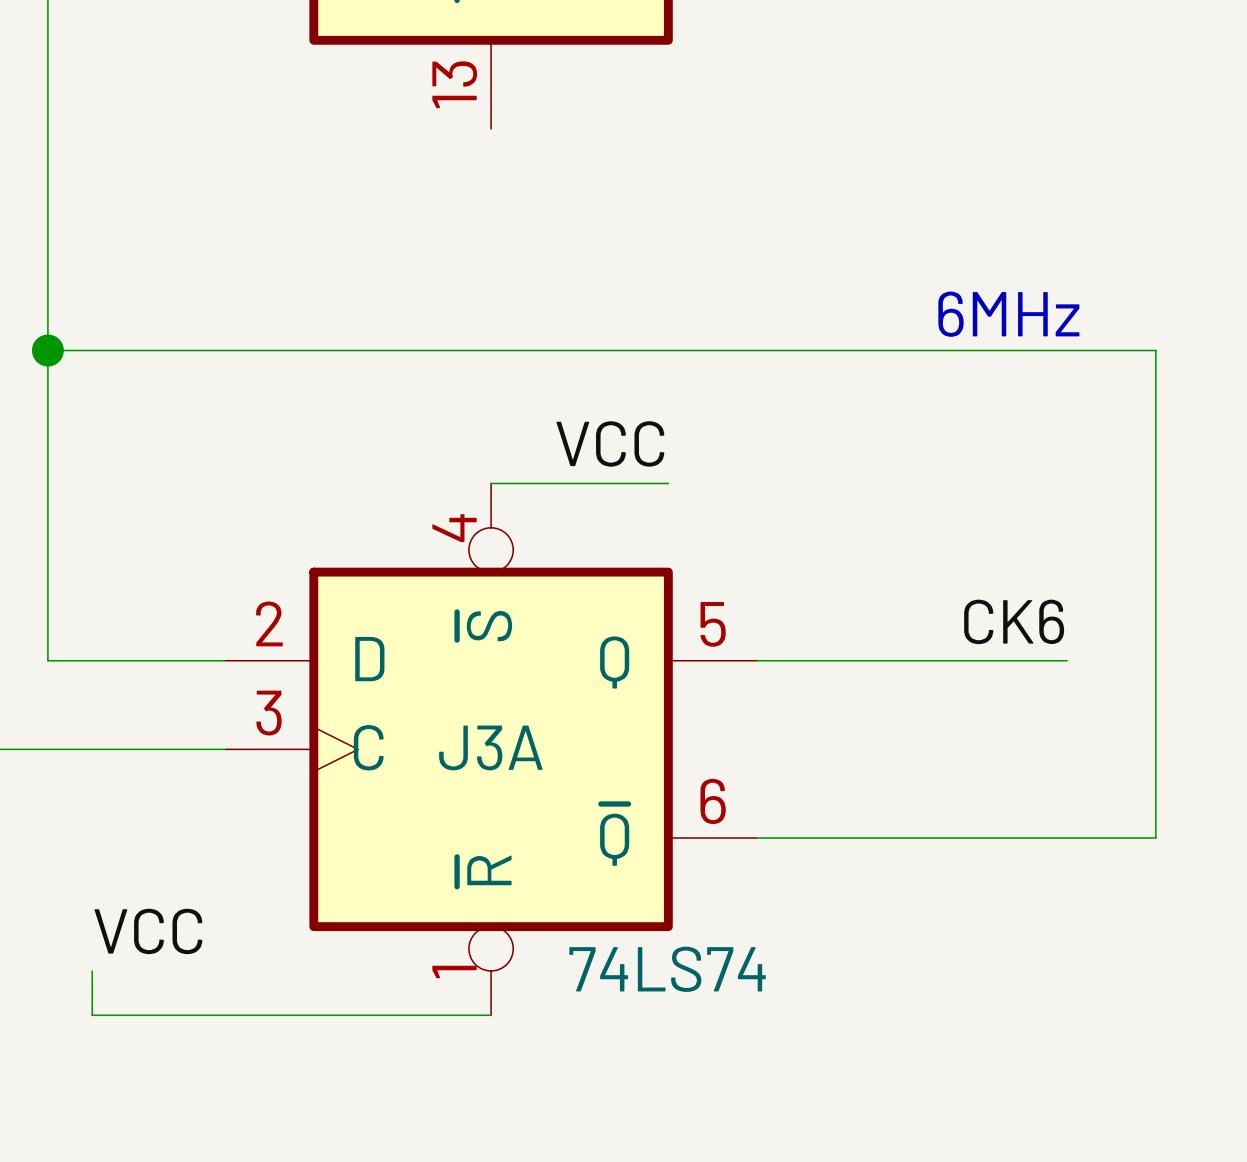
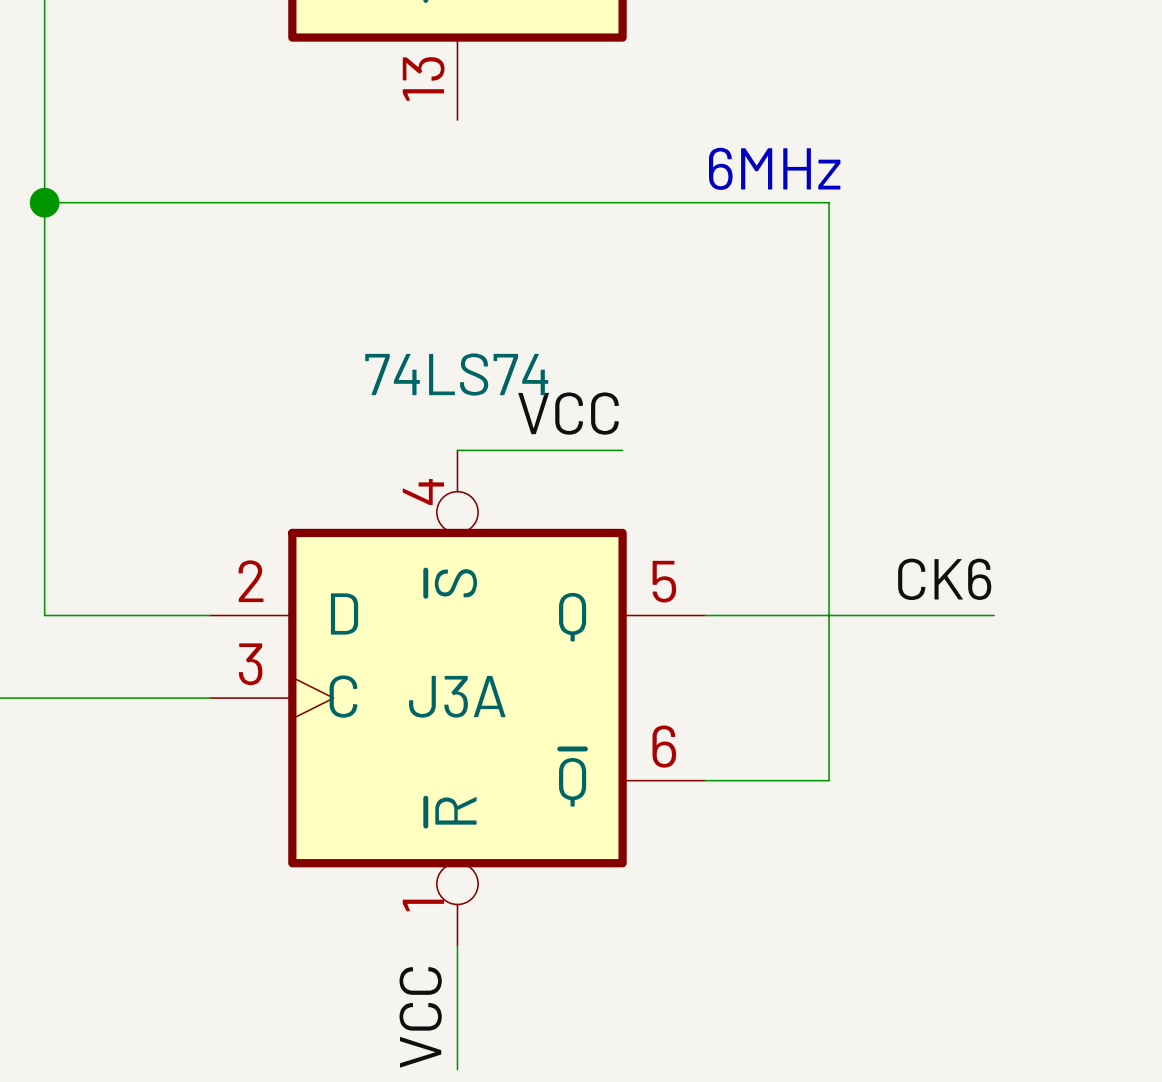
text position: 6MHz (1008, 314) -> 6MHz (774, 168)
wire: (47, 350) (1155, 350) (1155, 838) (889, 838) -> (44, 202) (829, 202) (829, 780)
junction position: (47, 350) -> (44, 202)
label rotation: 0° (148, 931) -> 90° counterclockwise (420, 1017)
label position: VCC (148, 931) -> VCC (420, 1017)
J3A value position: 74LS74 (667, 969) -> 74LS74 (456, 374)
wire: (92, 970) (92, 1015) (491, 1015) -> (457, 1069) (457, 945)

